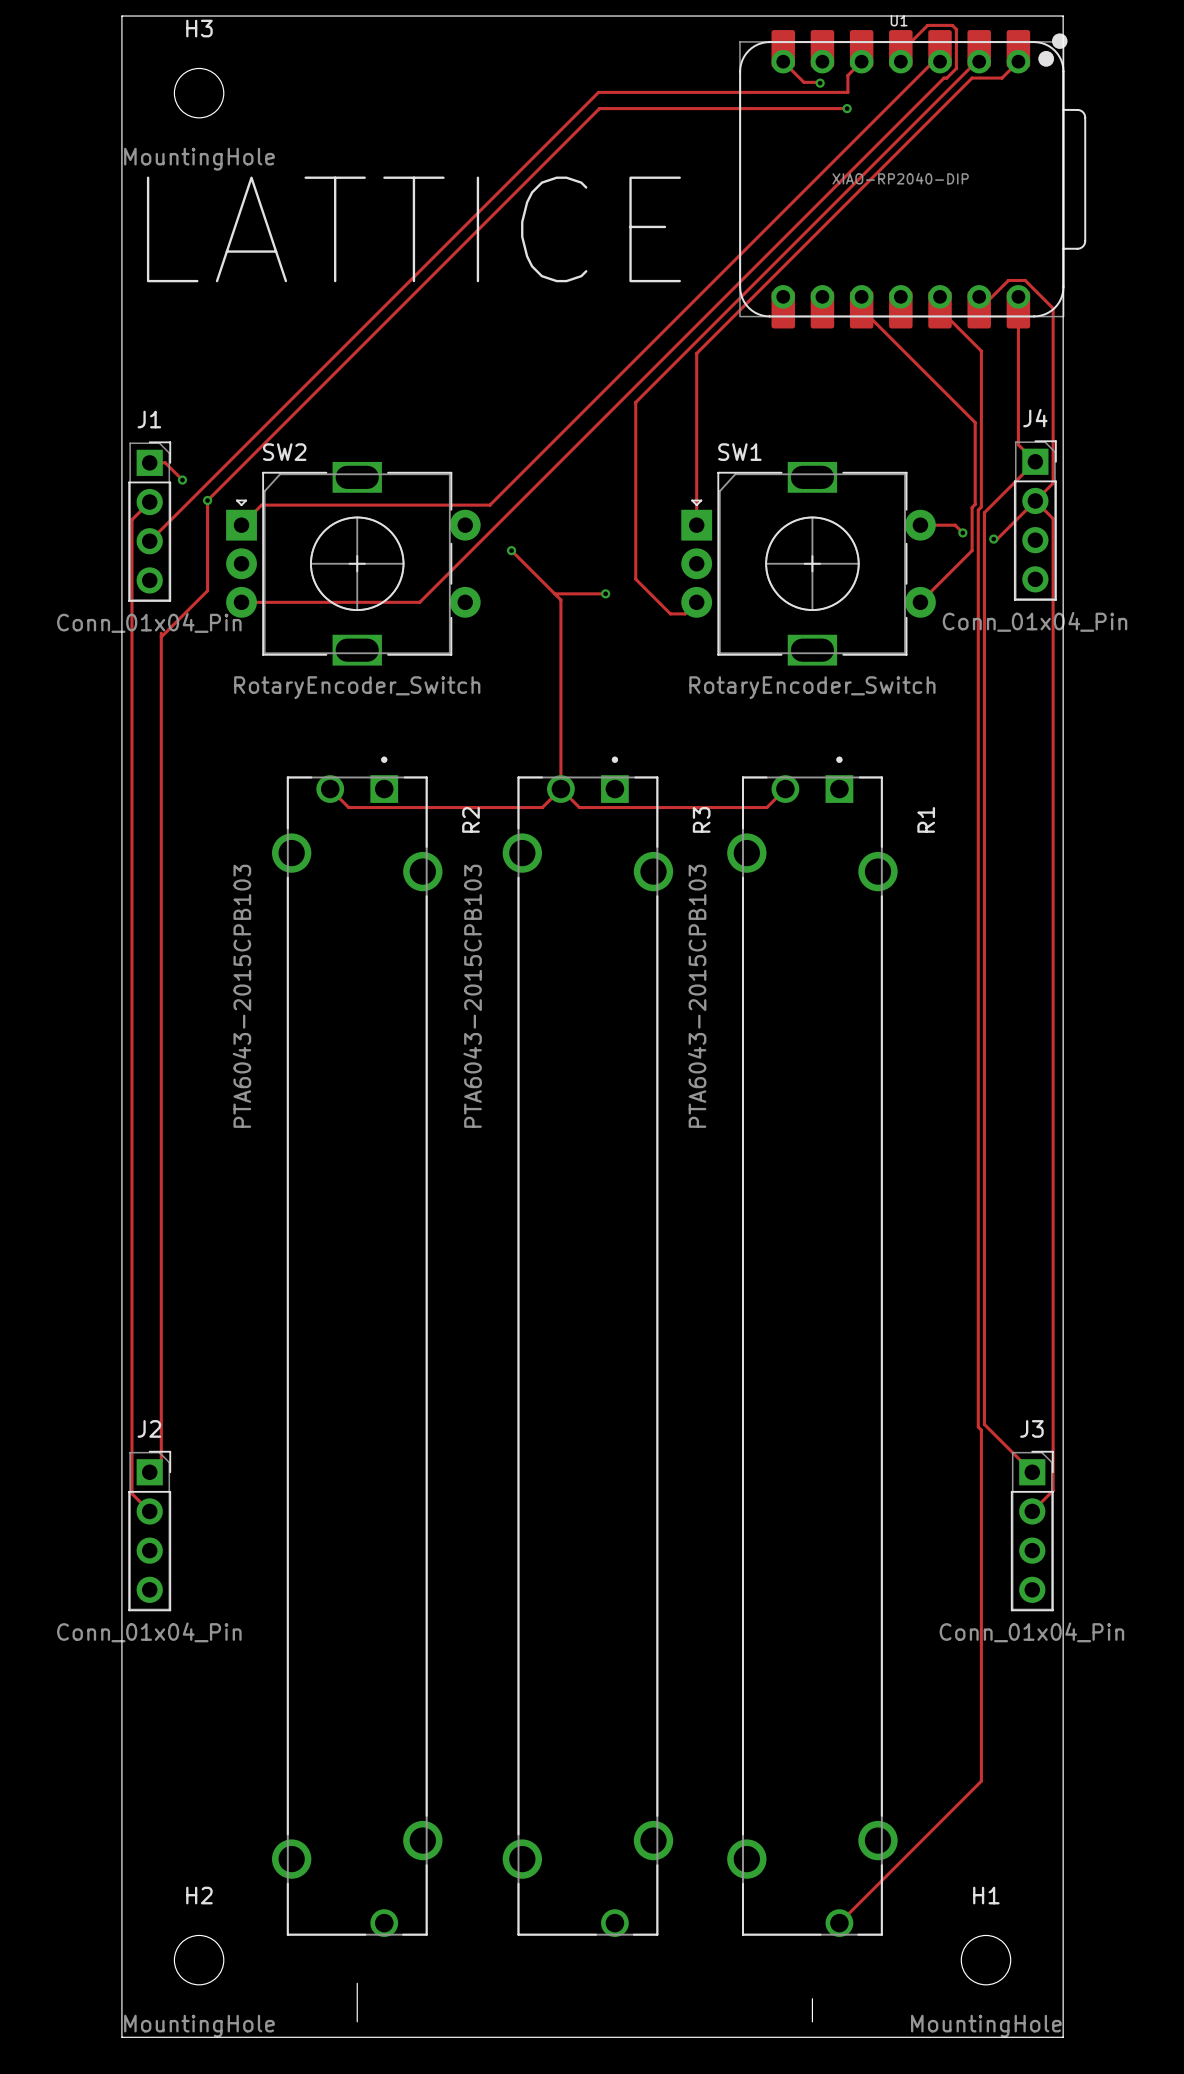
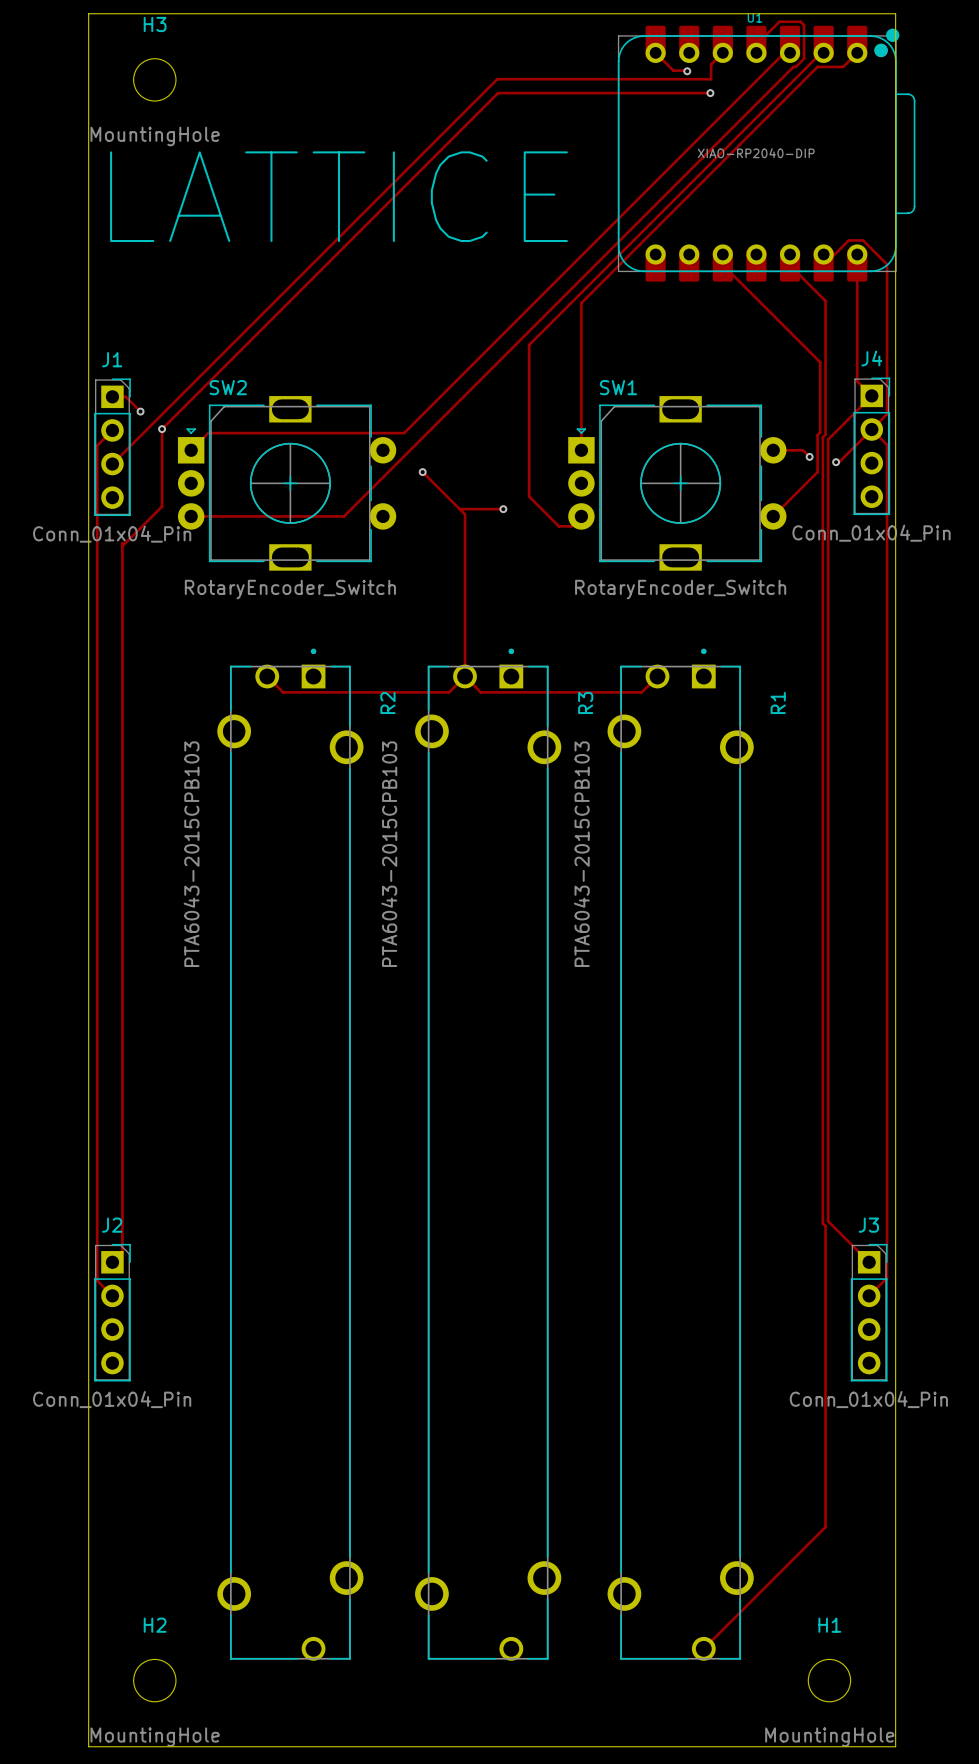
board edge: (357, 1983) (357, 2021) -> none
board edge: (812, 1998) (812, 2021) -> none

